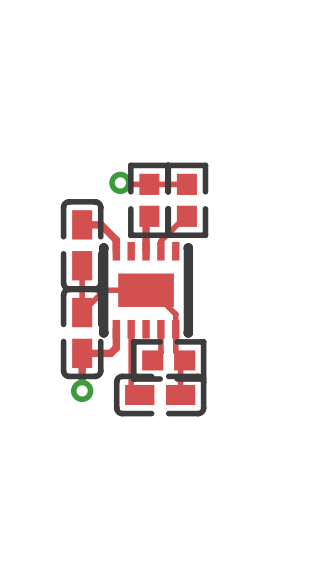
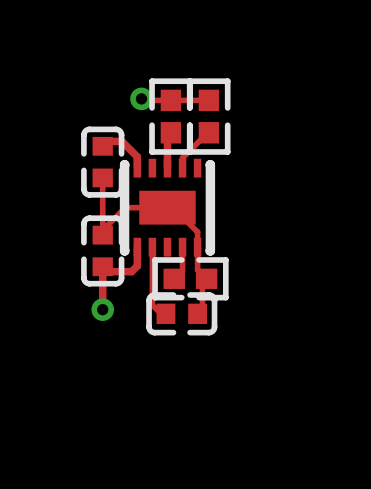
part footprint: [60, 199, 104, 292] -> [81, 126, 125, 198]
part footprint: [60, 286, 104, 380] -> [81, 215, 125, 287]
part footprint: [113, 373, 207, 417] -> [146, 292, 218, 336]

